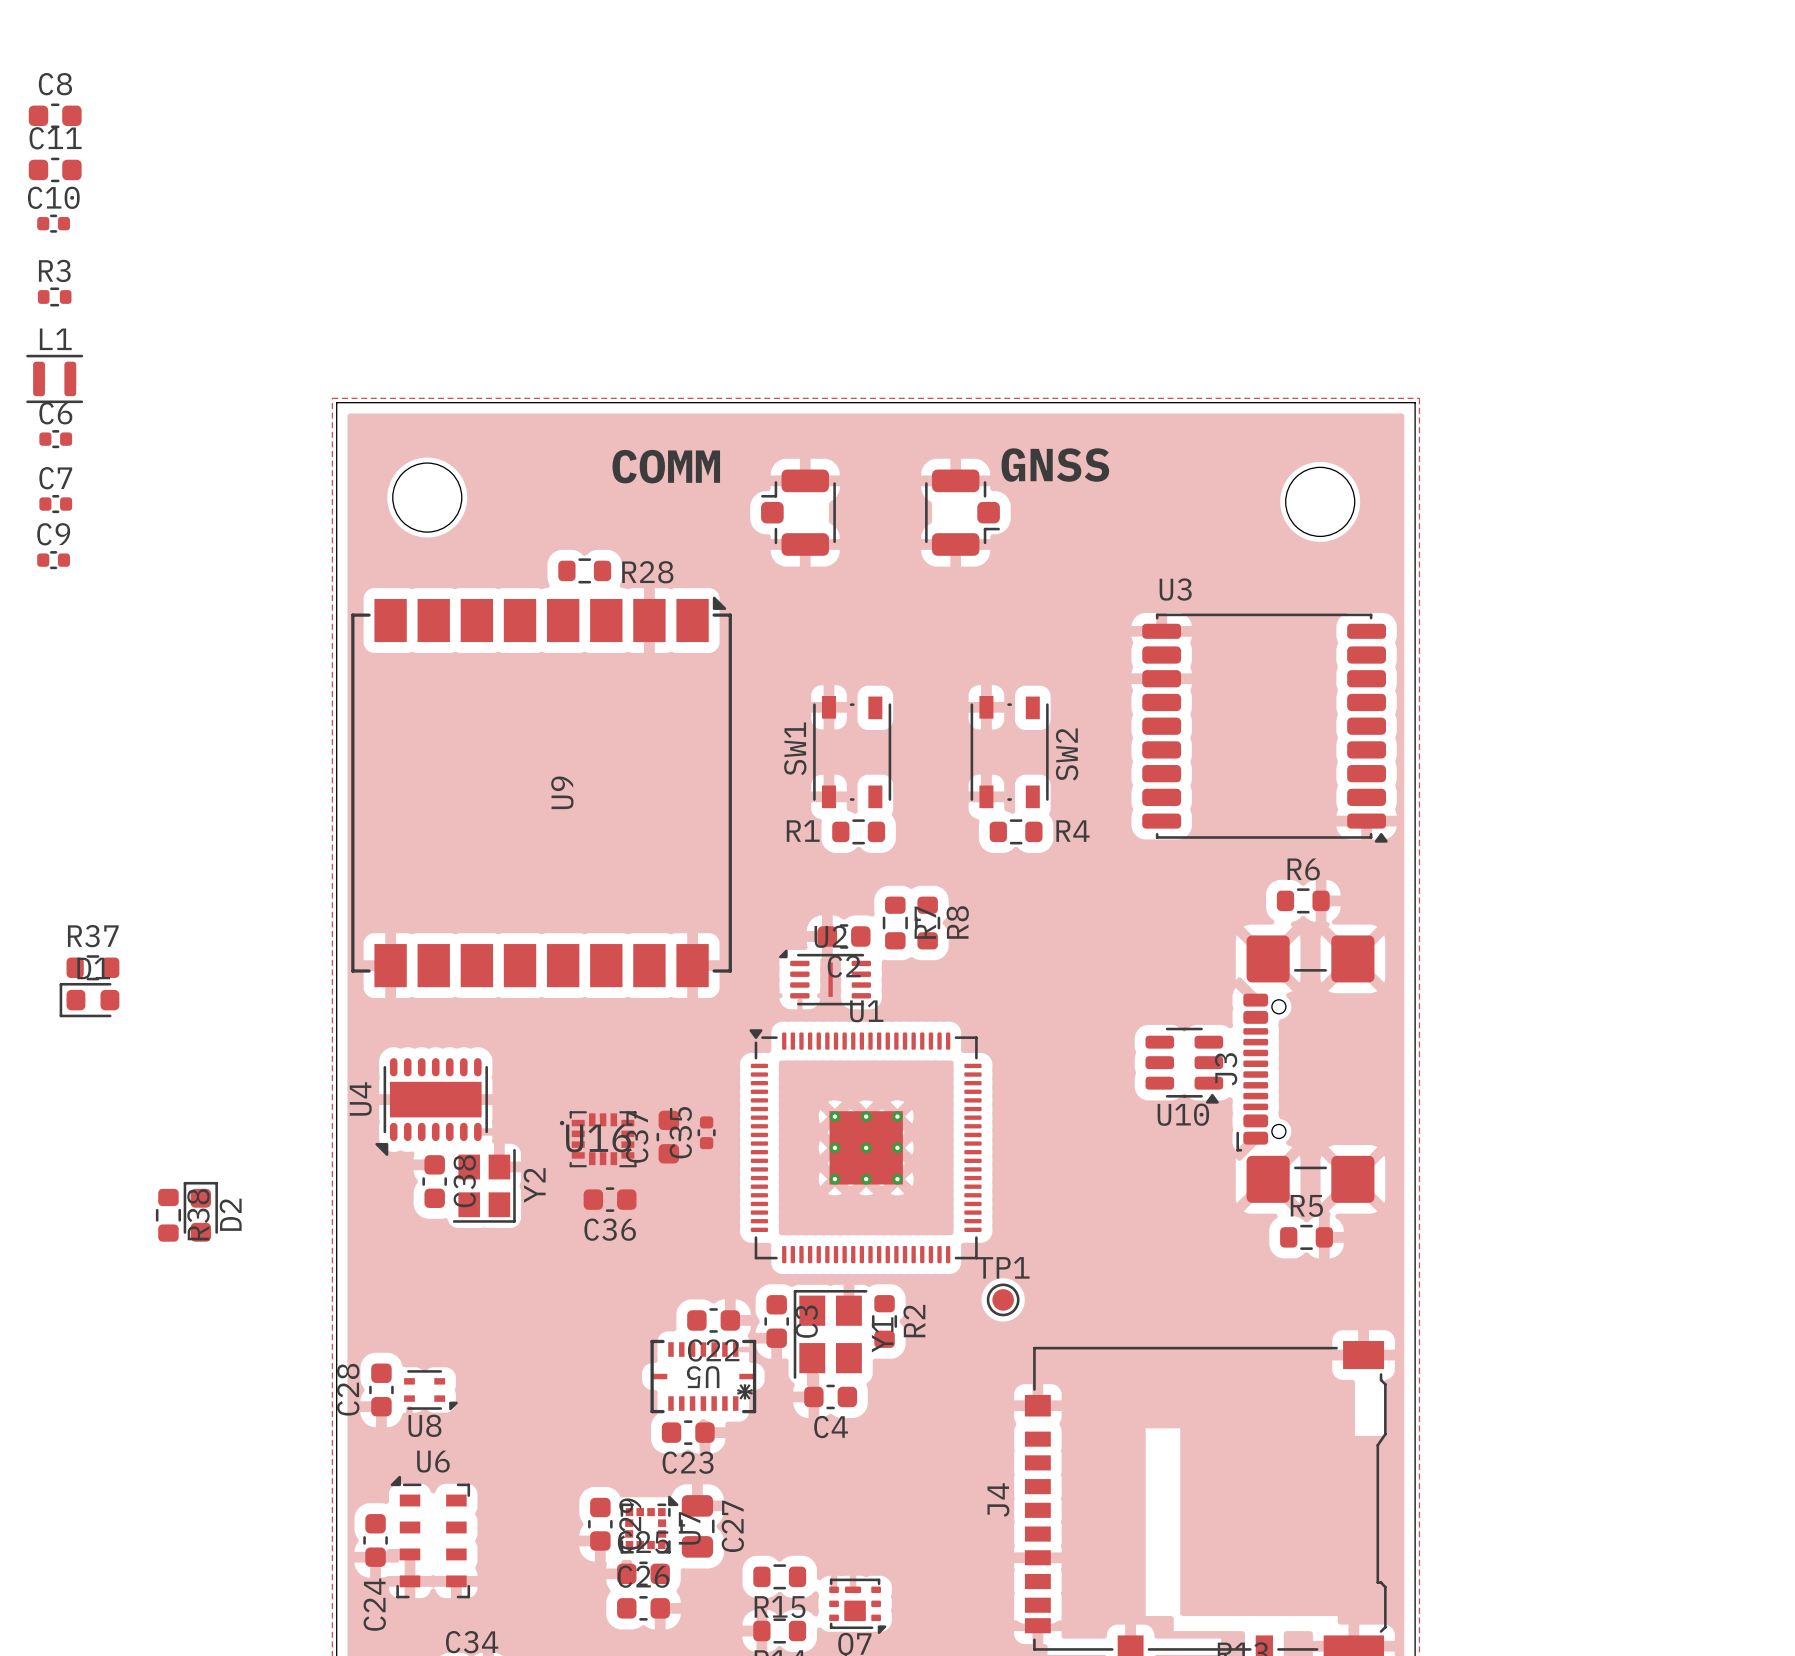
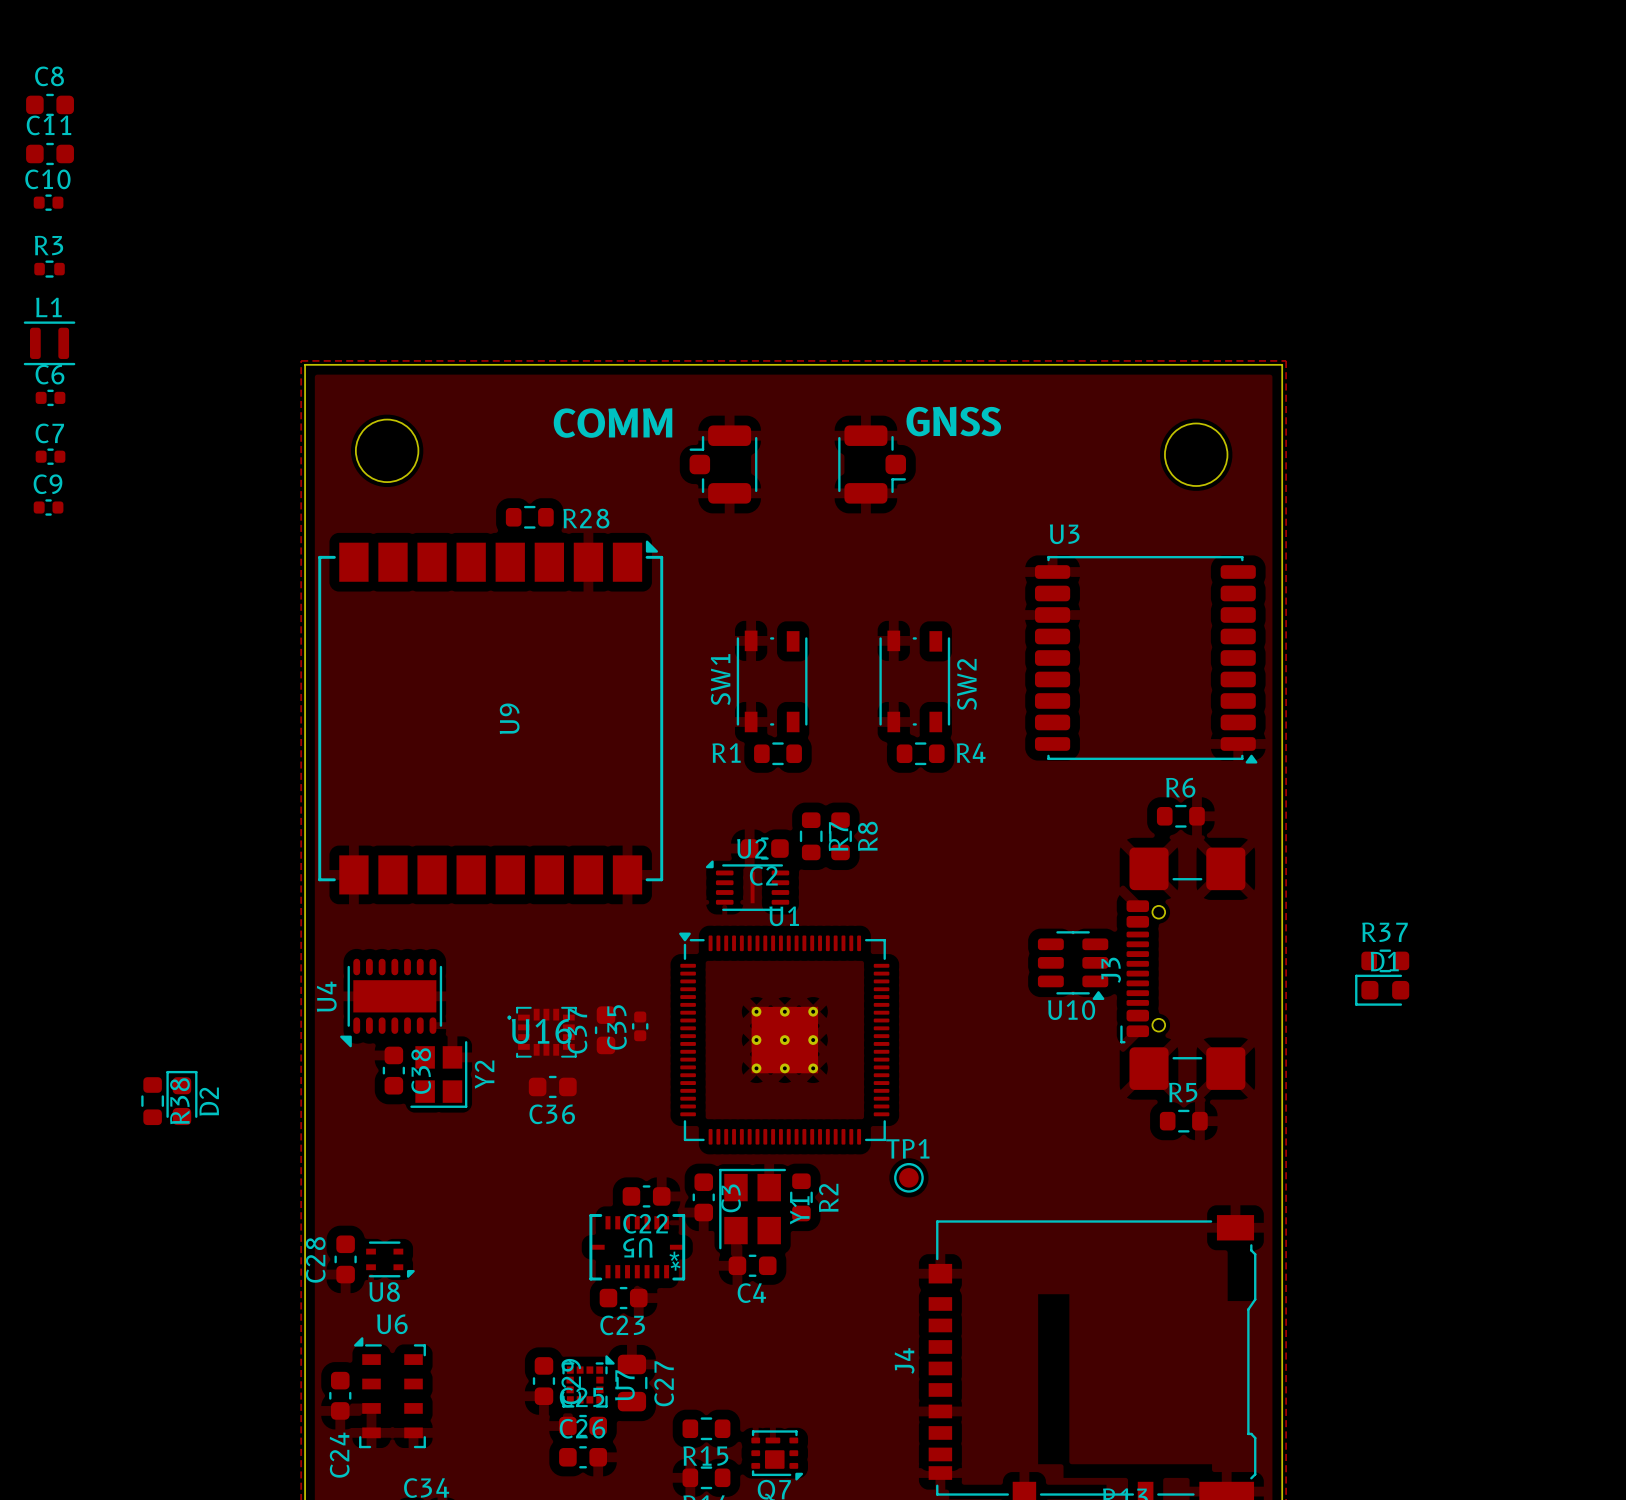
R37 position: (92, 967) -> (1385, 960)
D1 position: (89, 1000) -> (1382, 990)

